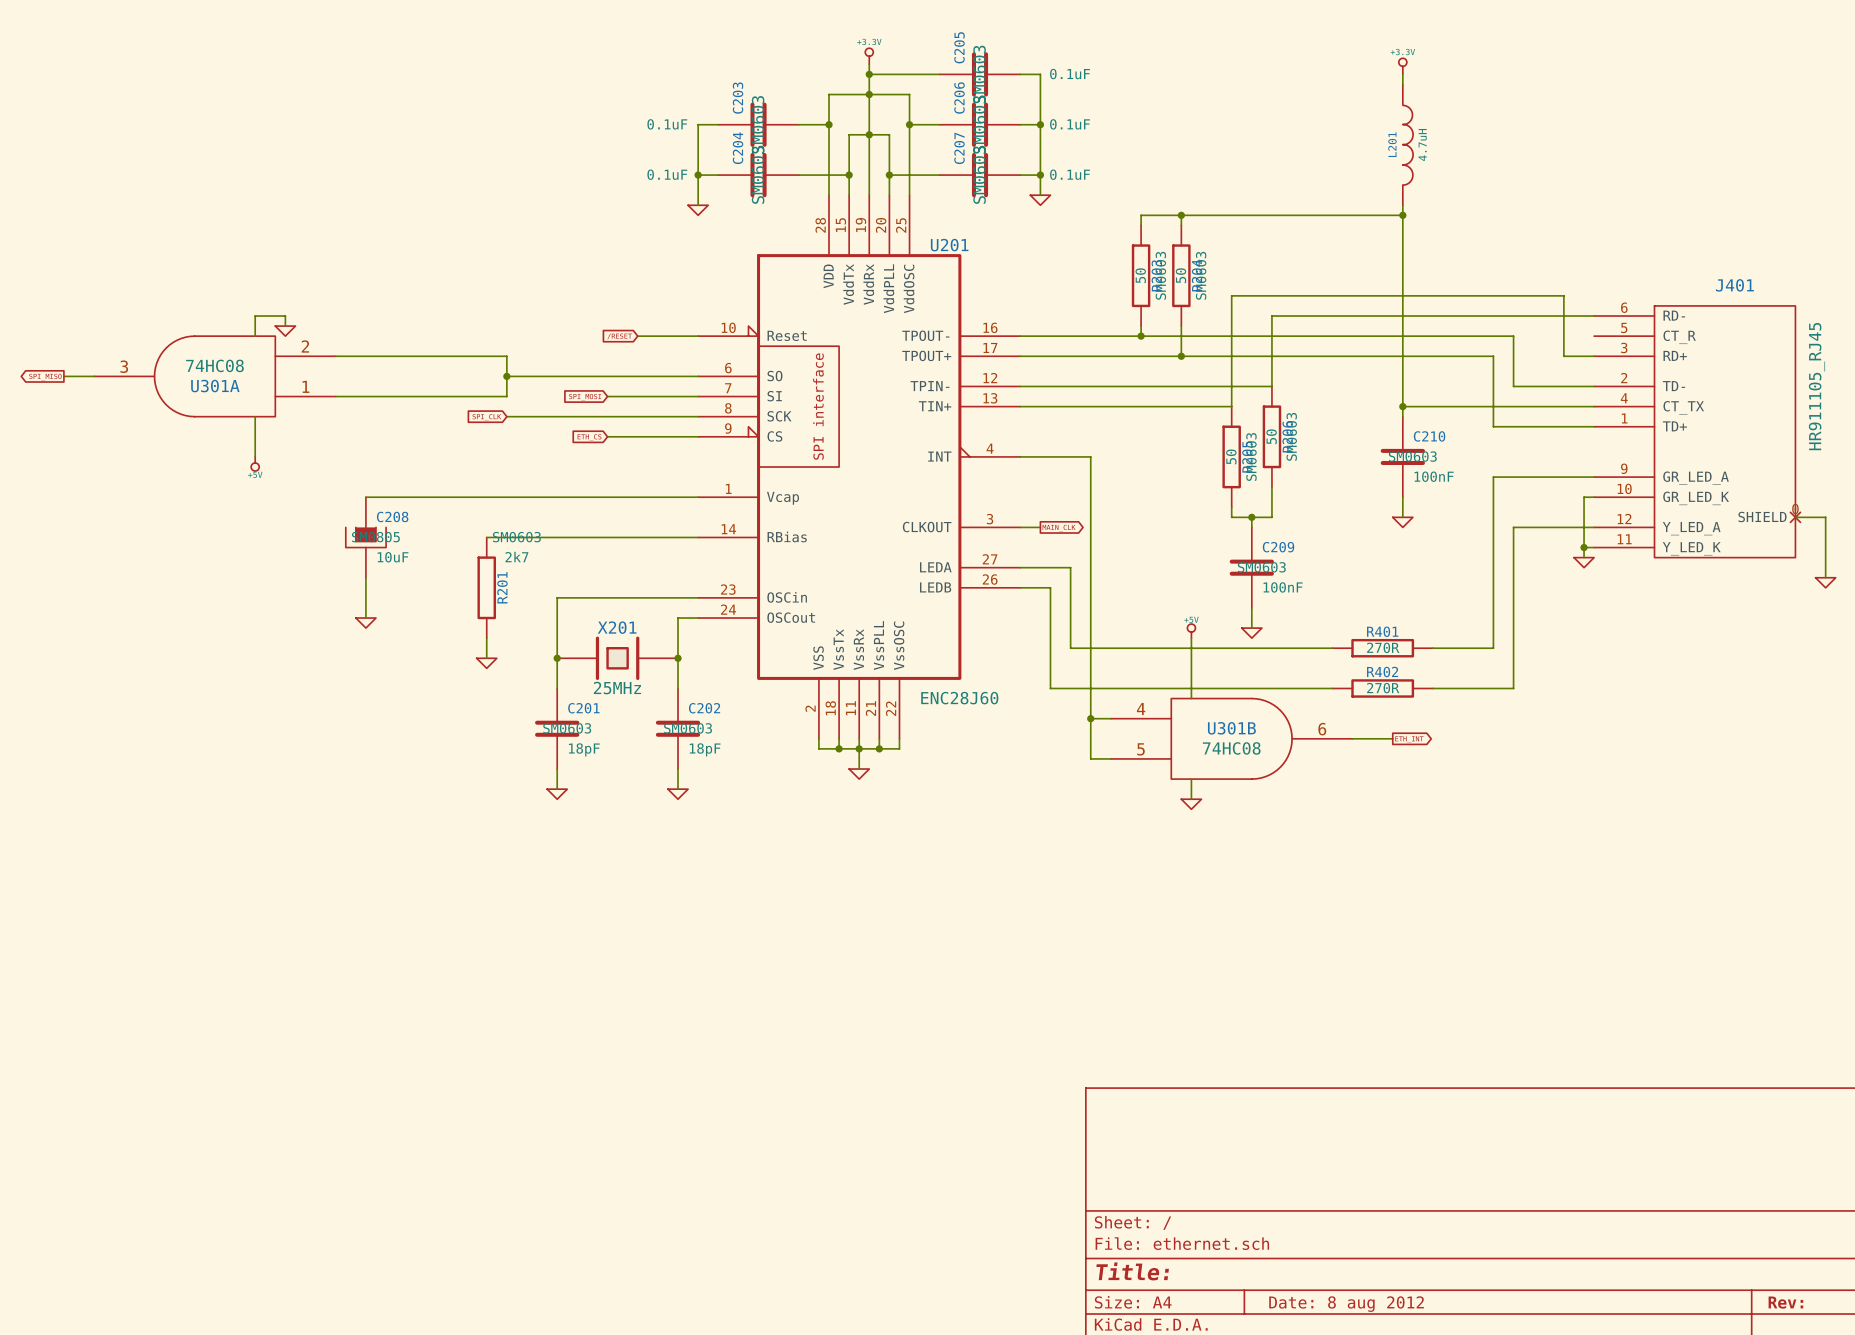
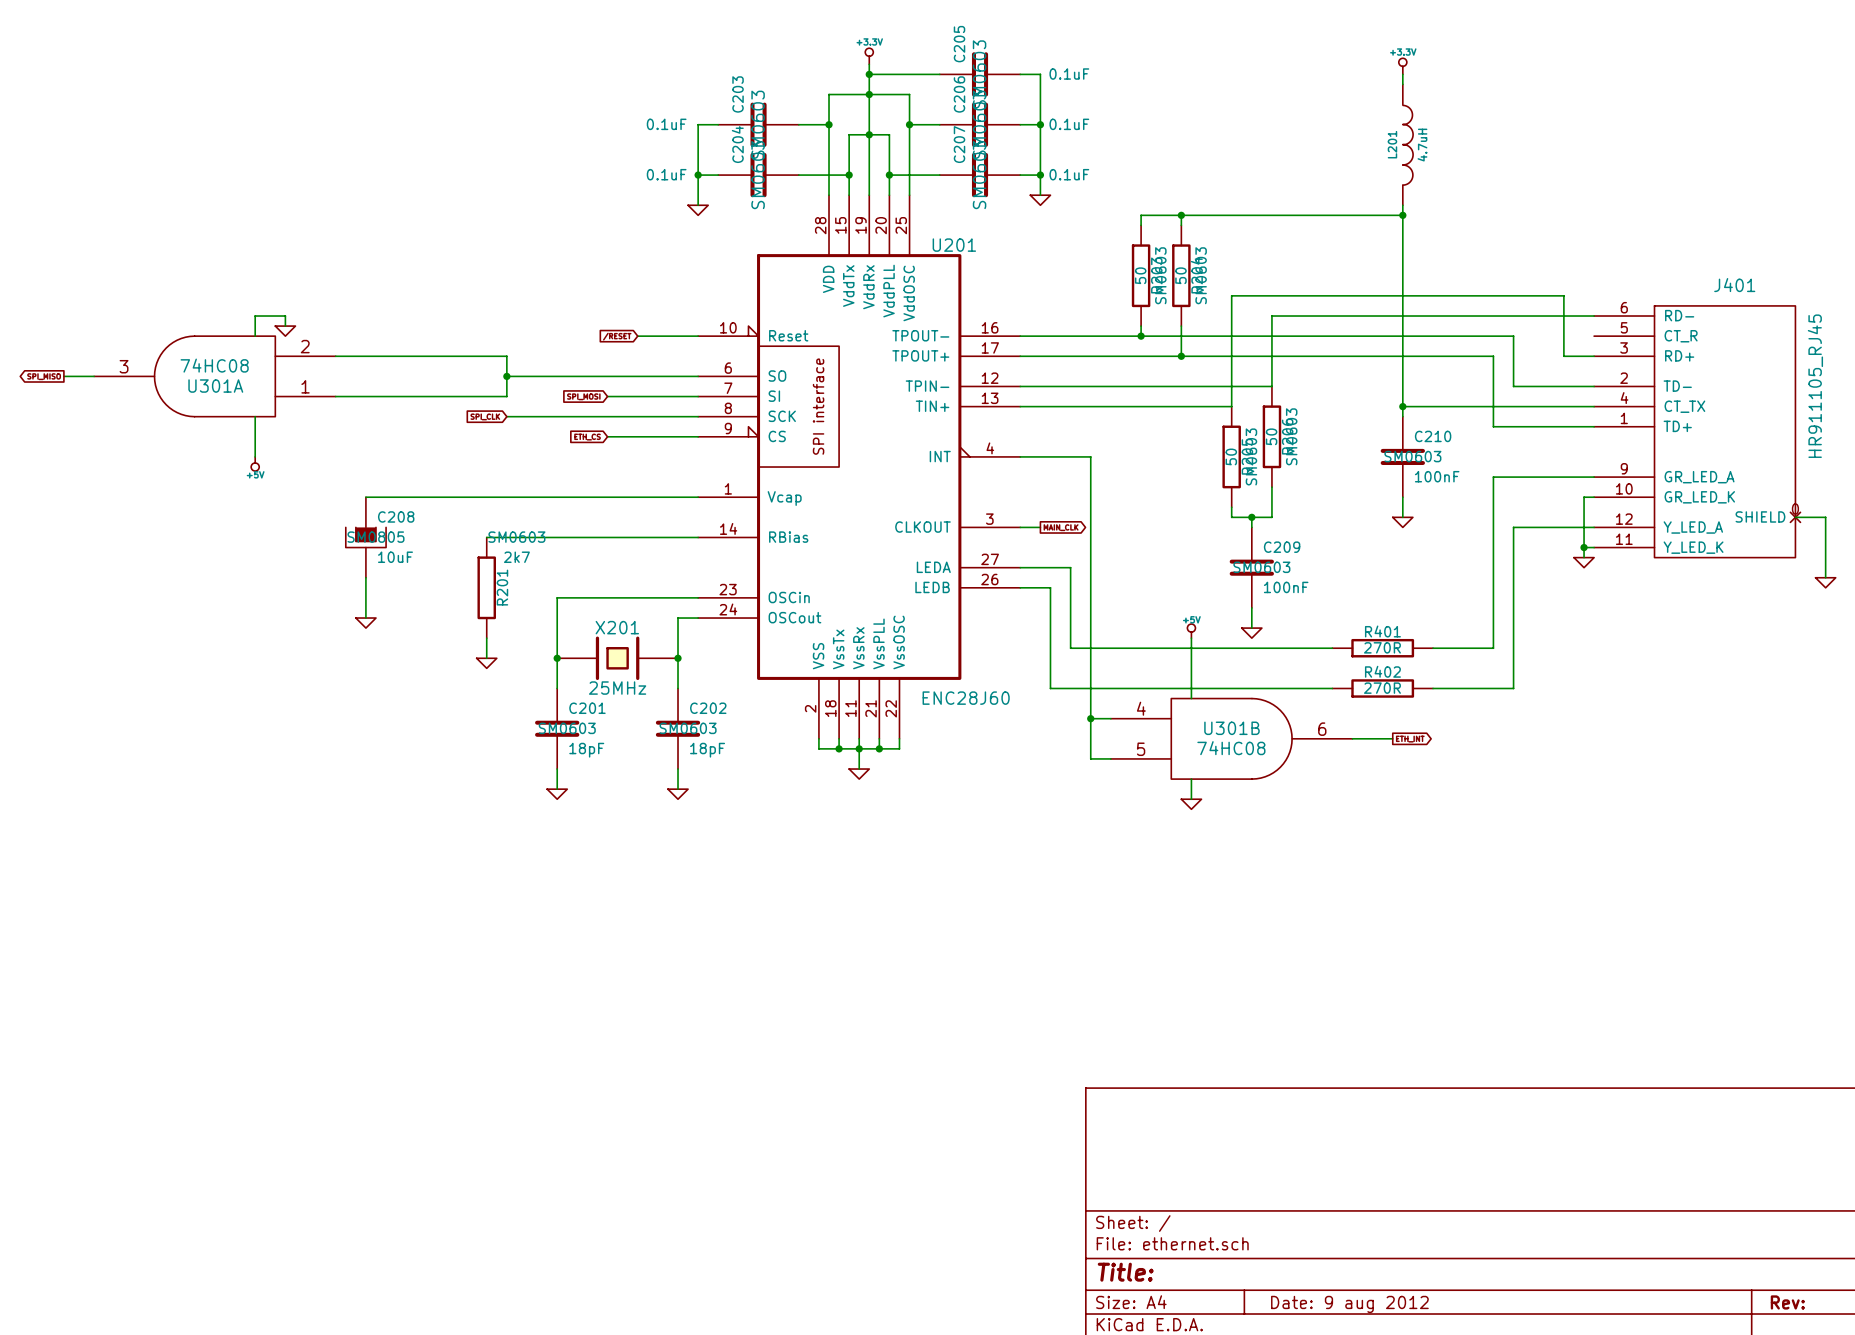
title block: Date: 8 aug 2012 (1346, 1304) -> Date: 9 aug 2012 (1349, 1304)

